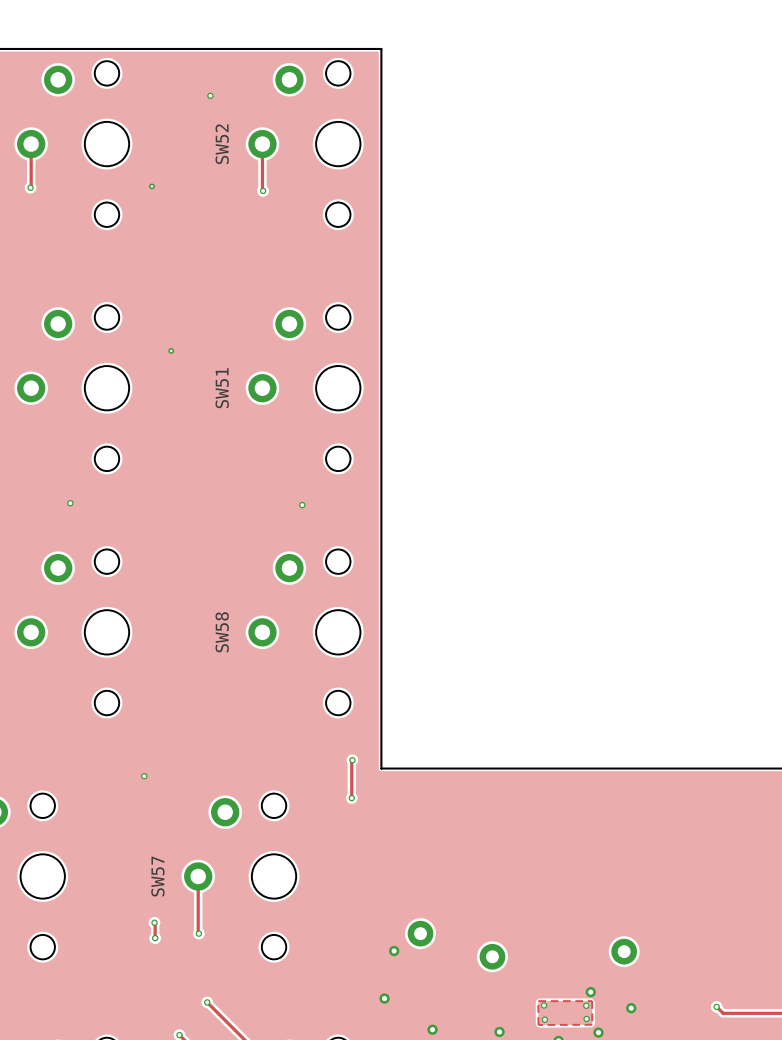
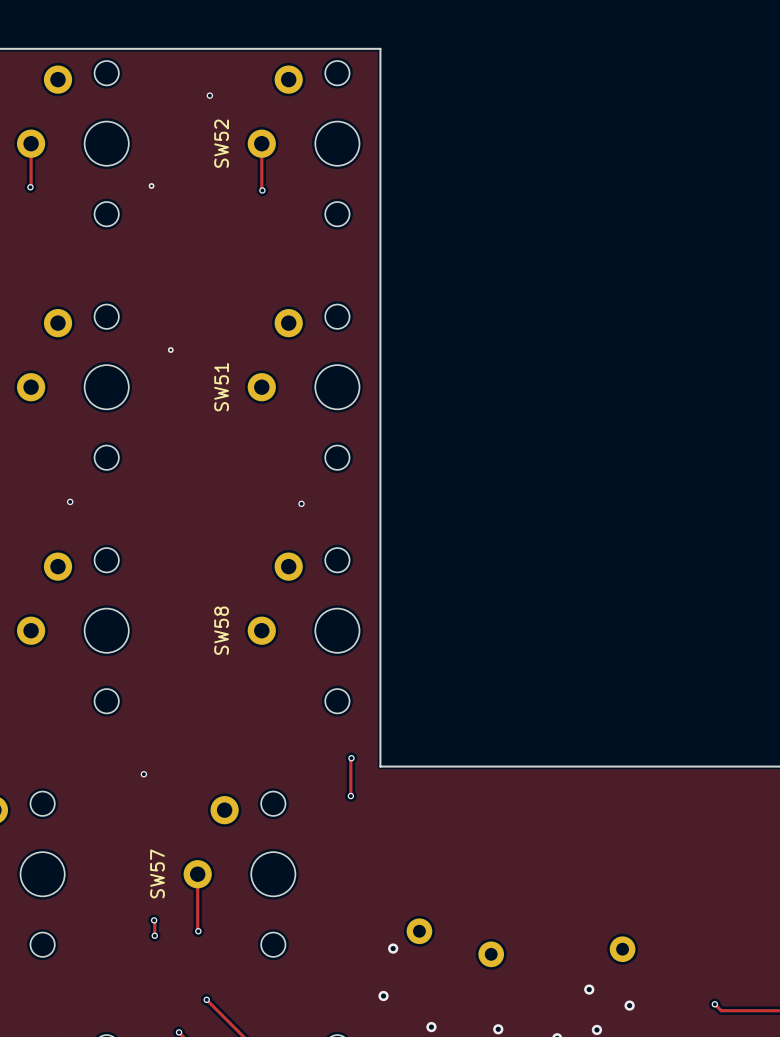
zone outline: (538, 1001) (538, 1025) (592, 1024) (592, 1001) (538, 1001) -> none
via: (543, 1005) -> none
via: (586, 1005) -> none
via: (586, 1018) -> none
via: (544, 1019) -> none

